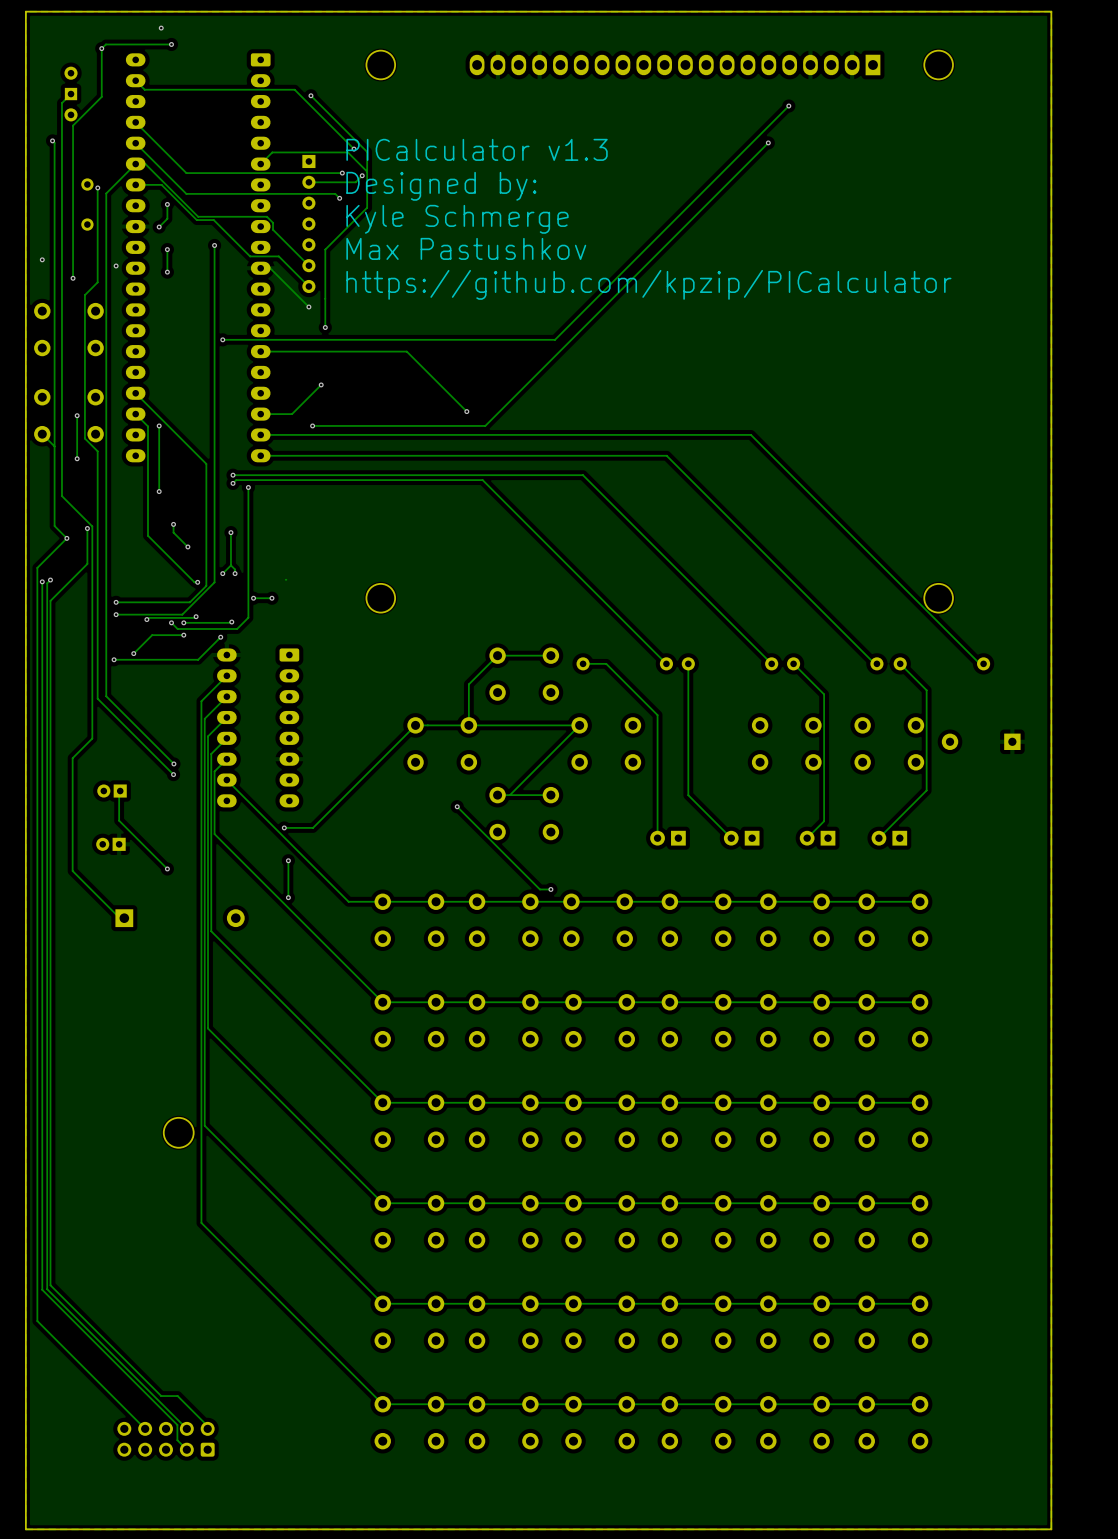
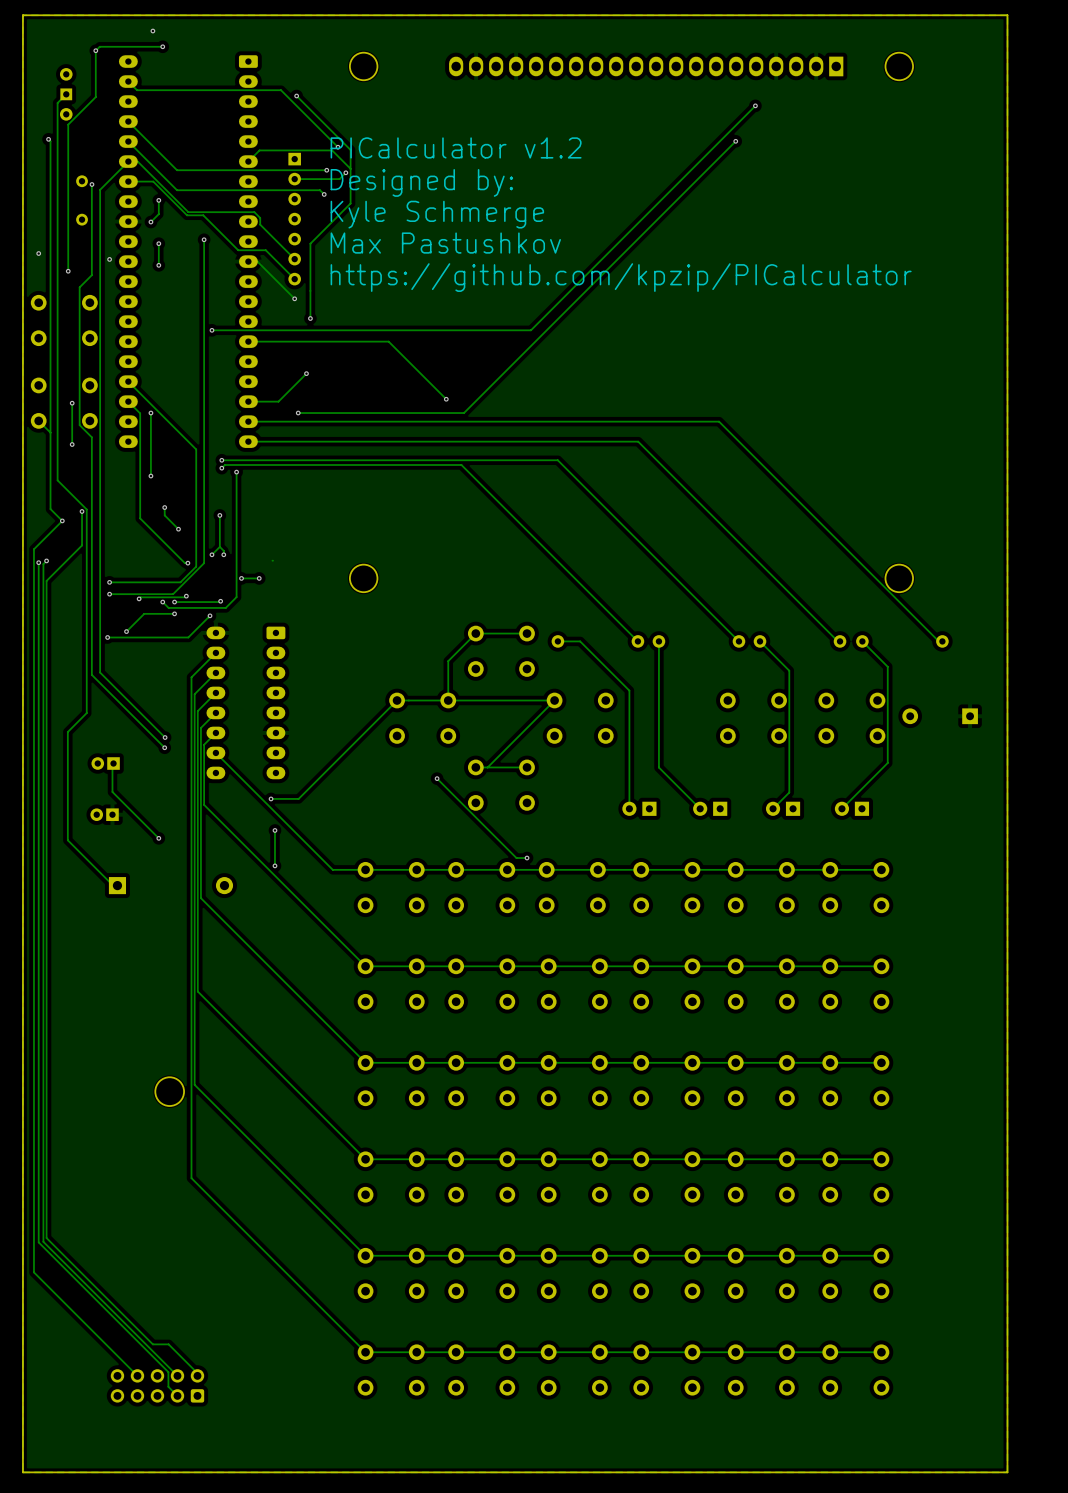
text: PICalculator v1.3 (477, 149) -> PICalculator v1.2 (456, 147)

